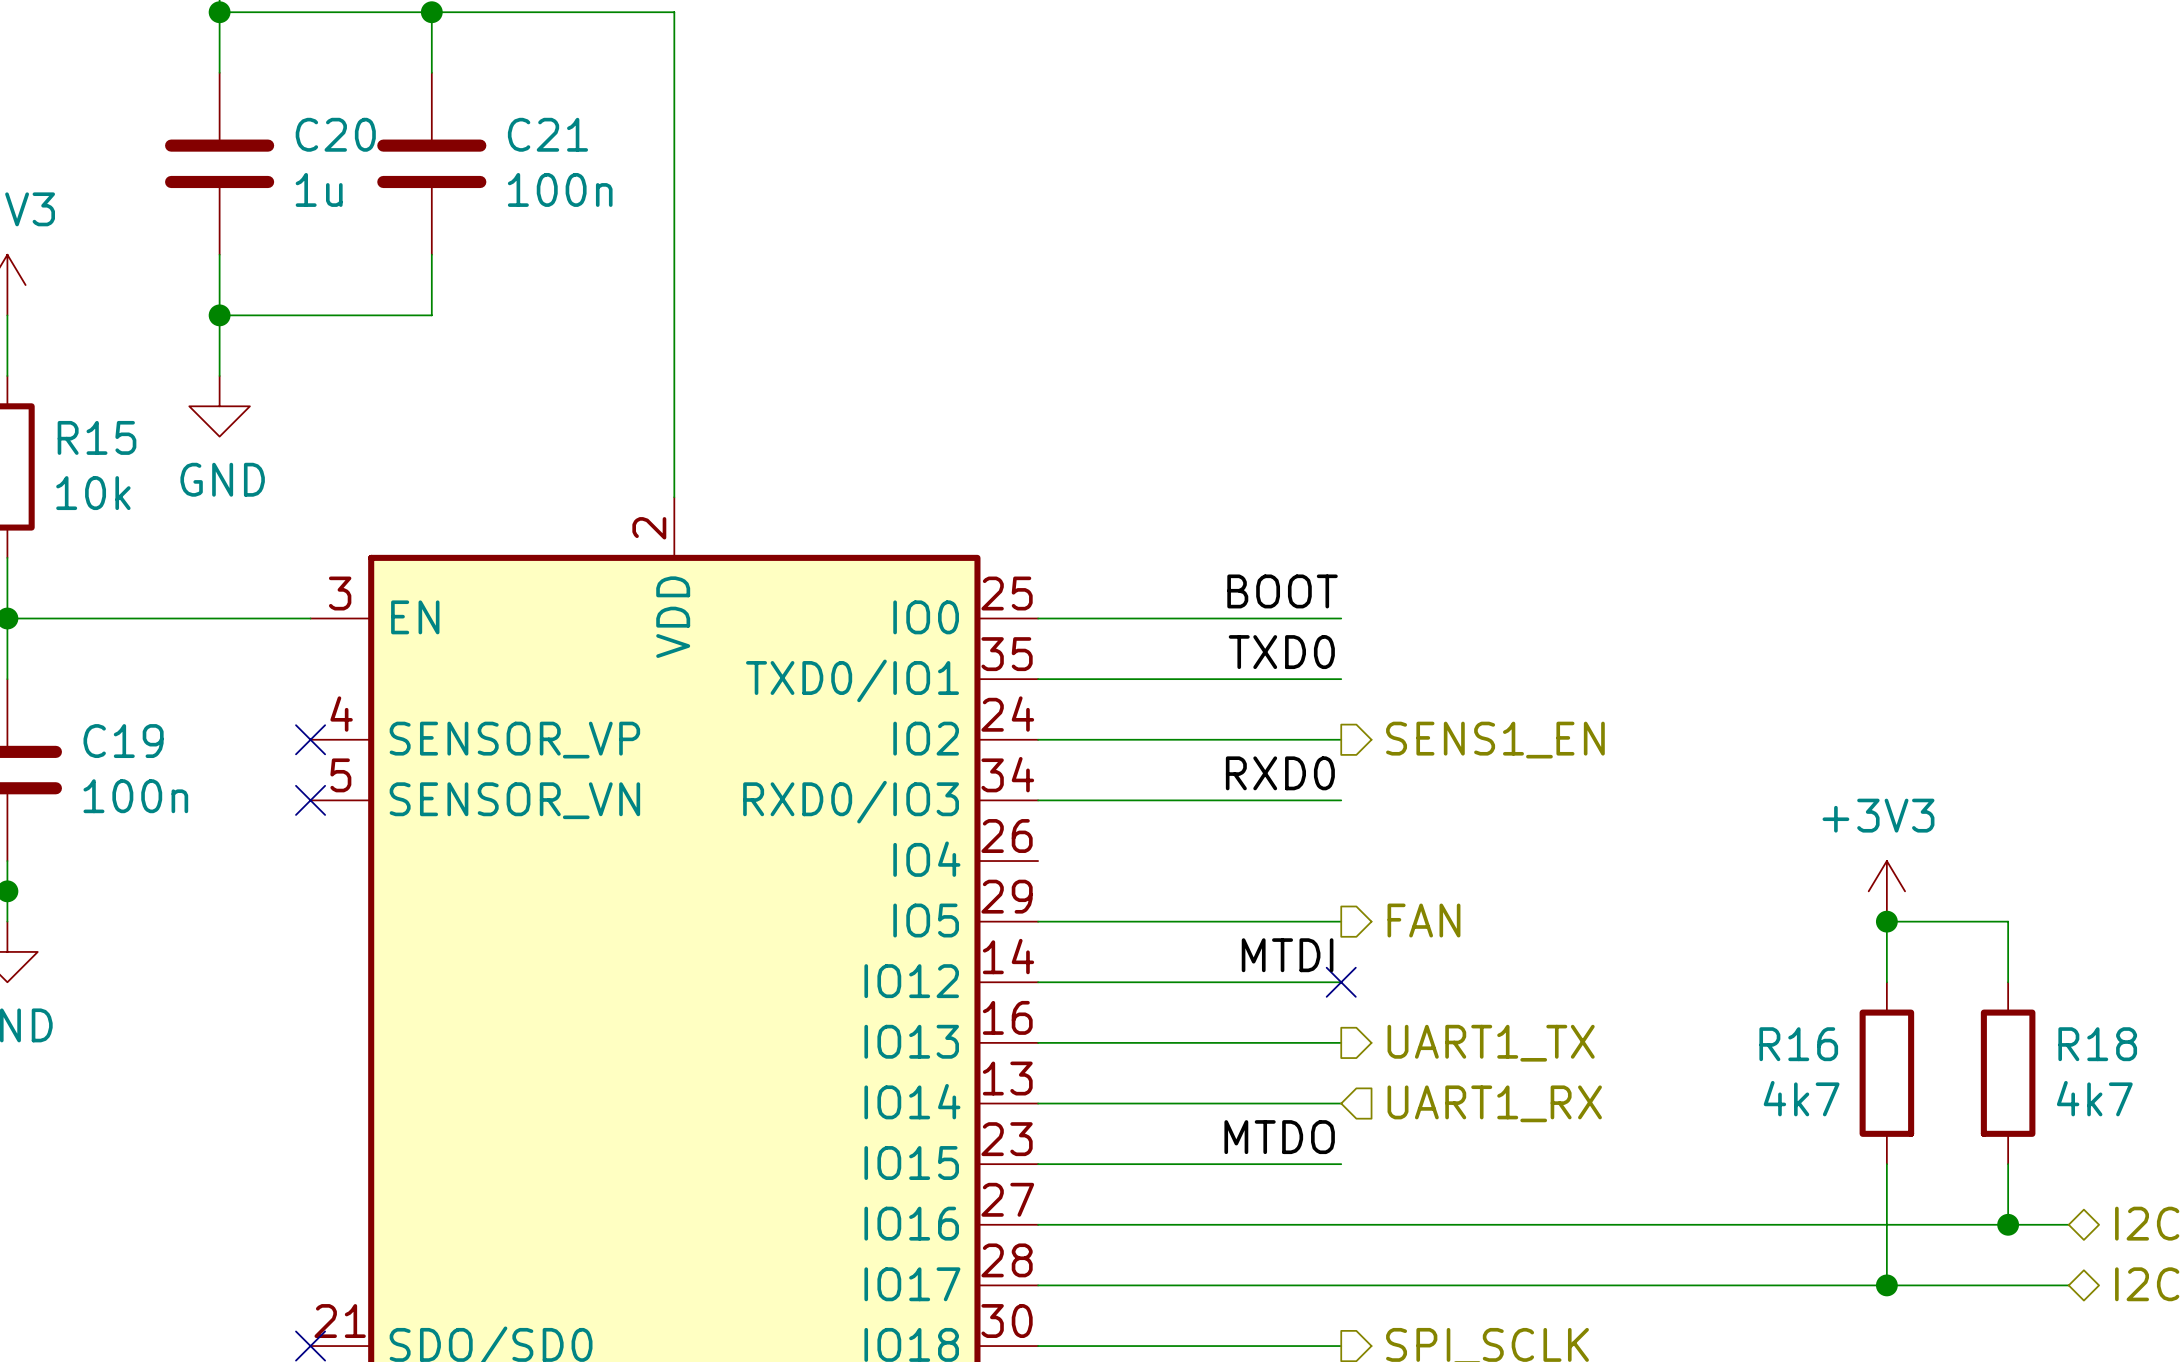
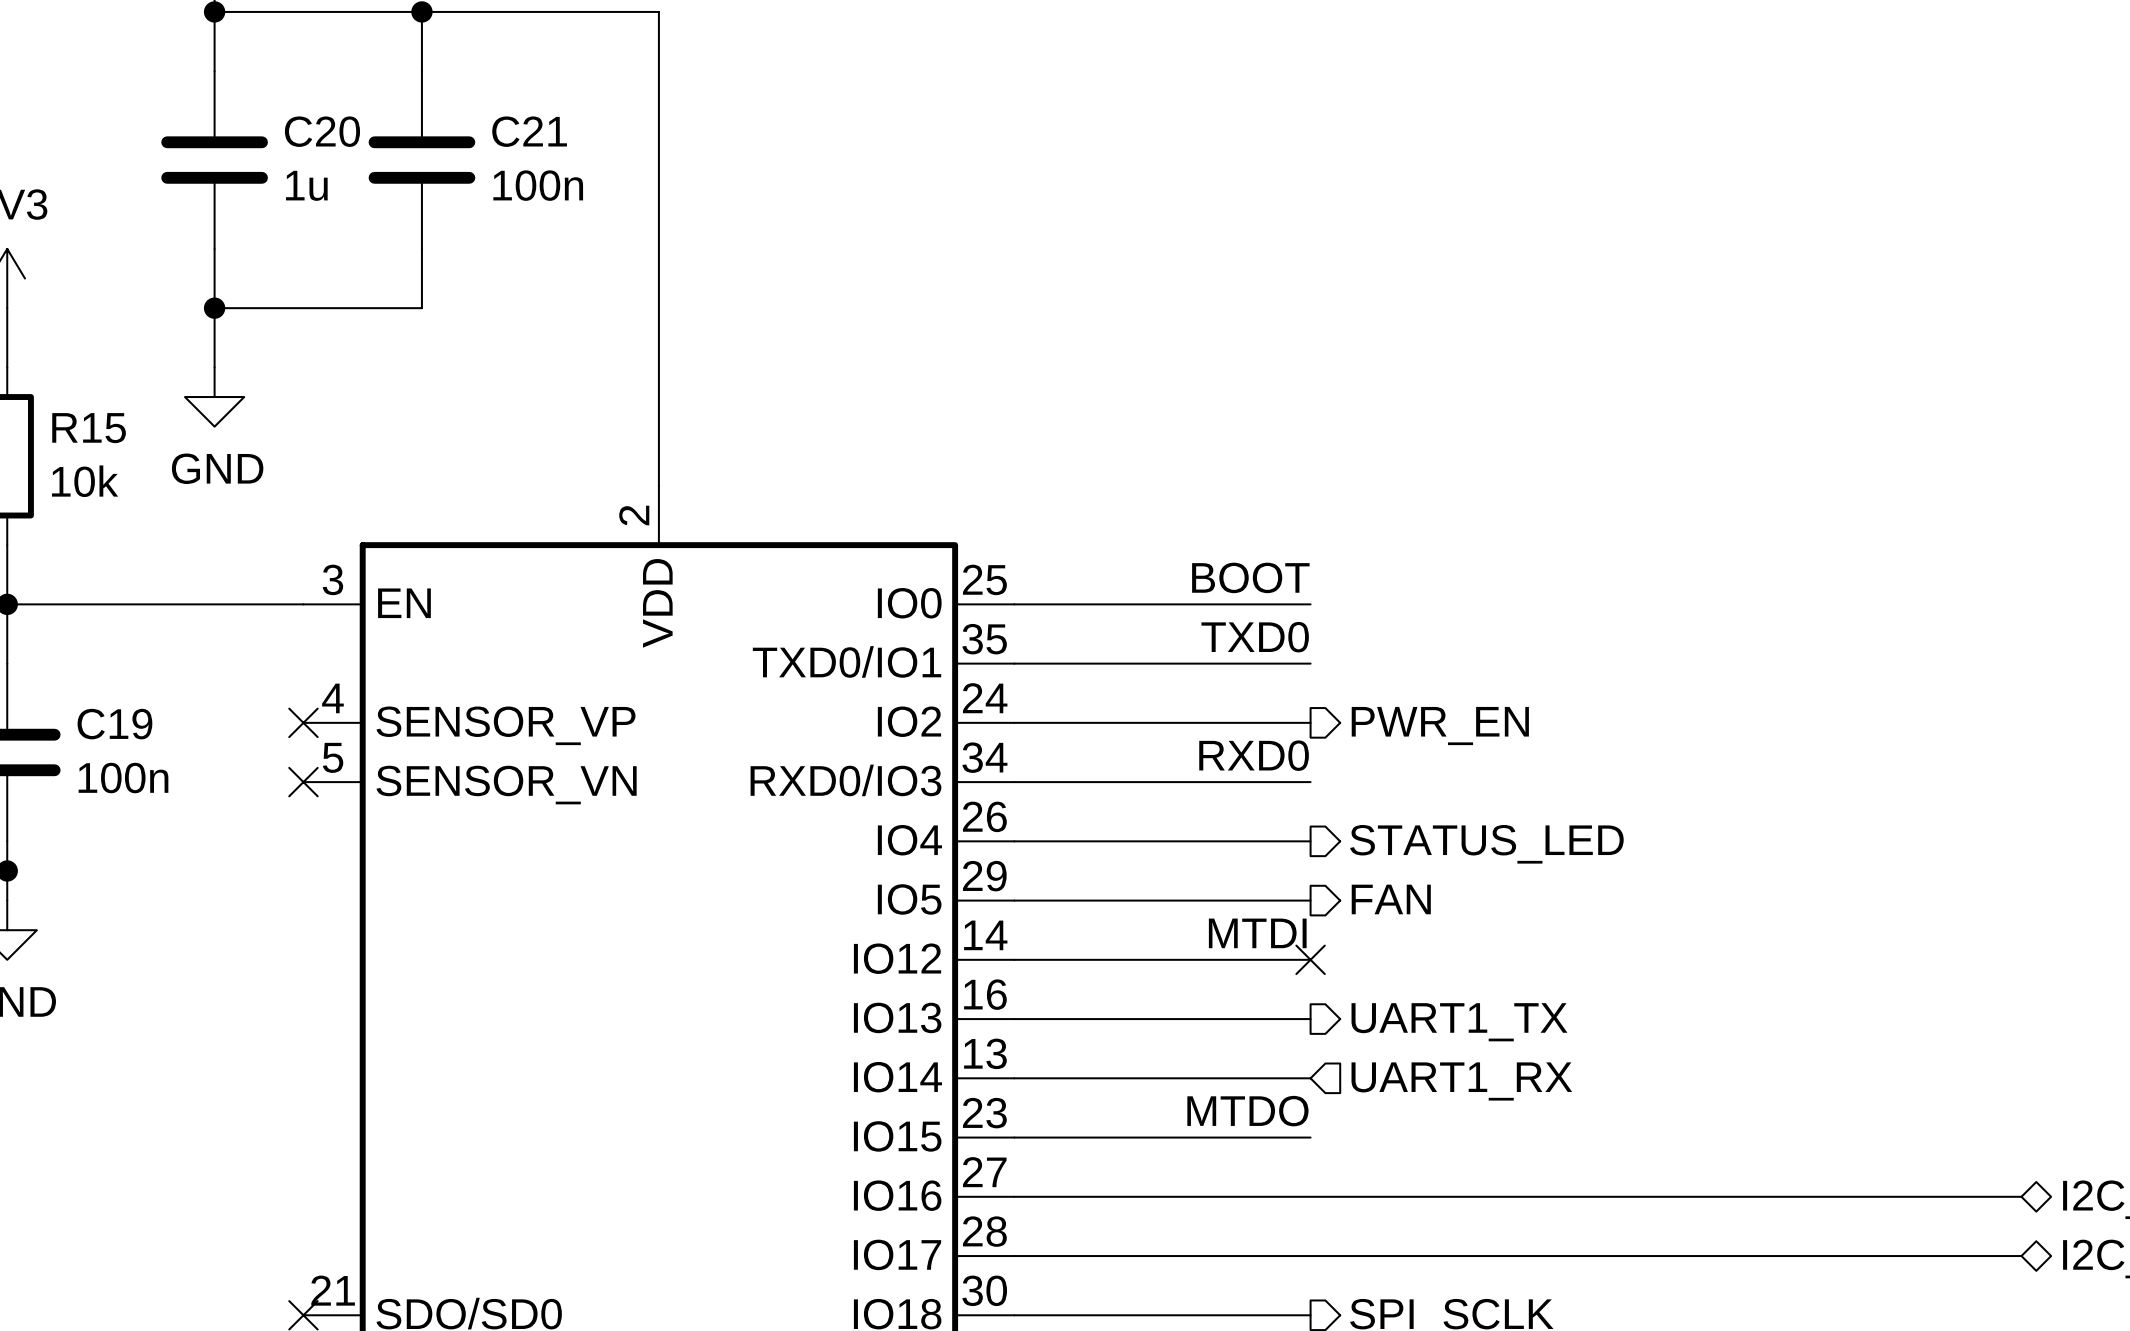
hierarchical label: SENS1_EN (1495, 740) -> PWR_EN (1440, 726)
wire: none -> (1014, 841) (1310, 841)
hierarchical label: none -> STATUS_LED (1486, 844)
power symbol: +3V3 (1886, 891) -> none
junction: (1886, 921) -> none
wire: (1886, 982) (1886, 921) (2008, 921) (2008, 982) -> none
R16: 4k7 (1886, 1073) -> none
R18: 4k7 (2008, 1073) -> none
wire: (1886, 1164) (1886, 1285) -> none
wire: (2008, 1164) (2008, 1224) -> none
junction: (2008, 1224) -> none
junction: (1886, 1285) -> none

